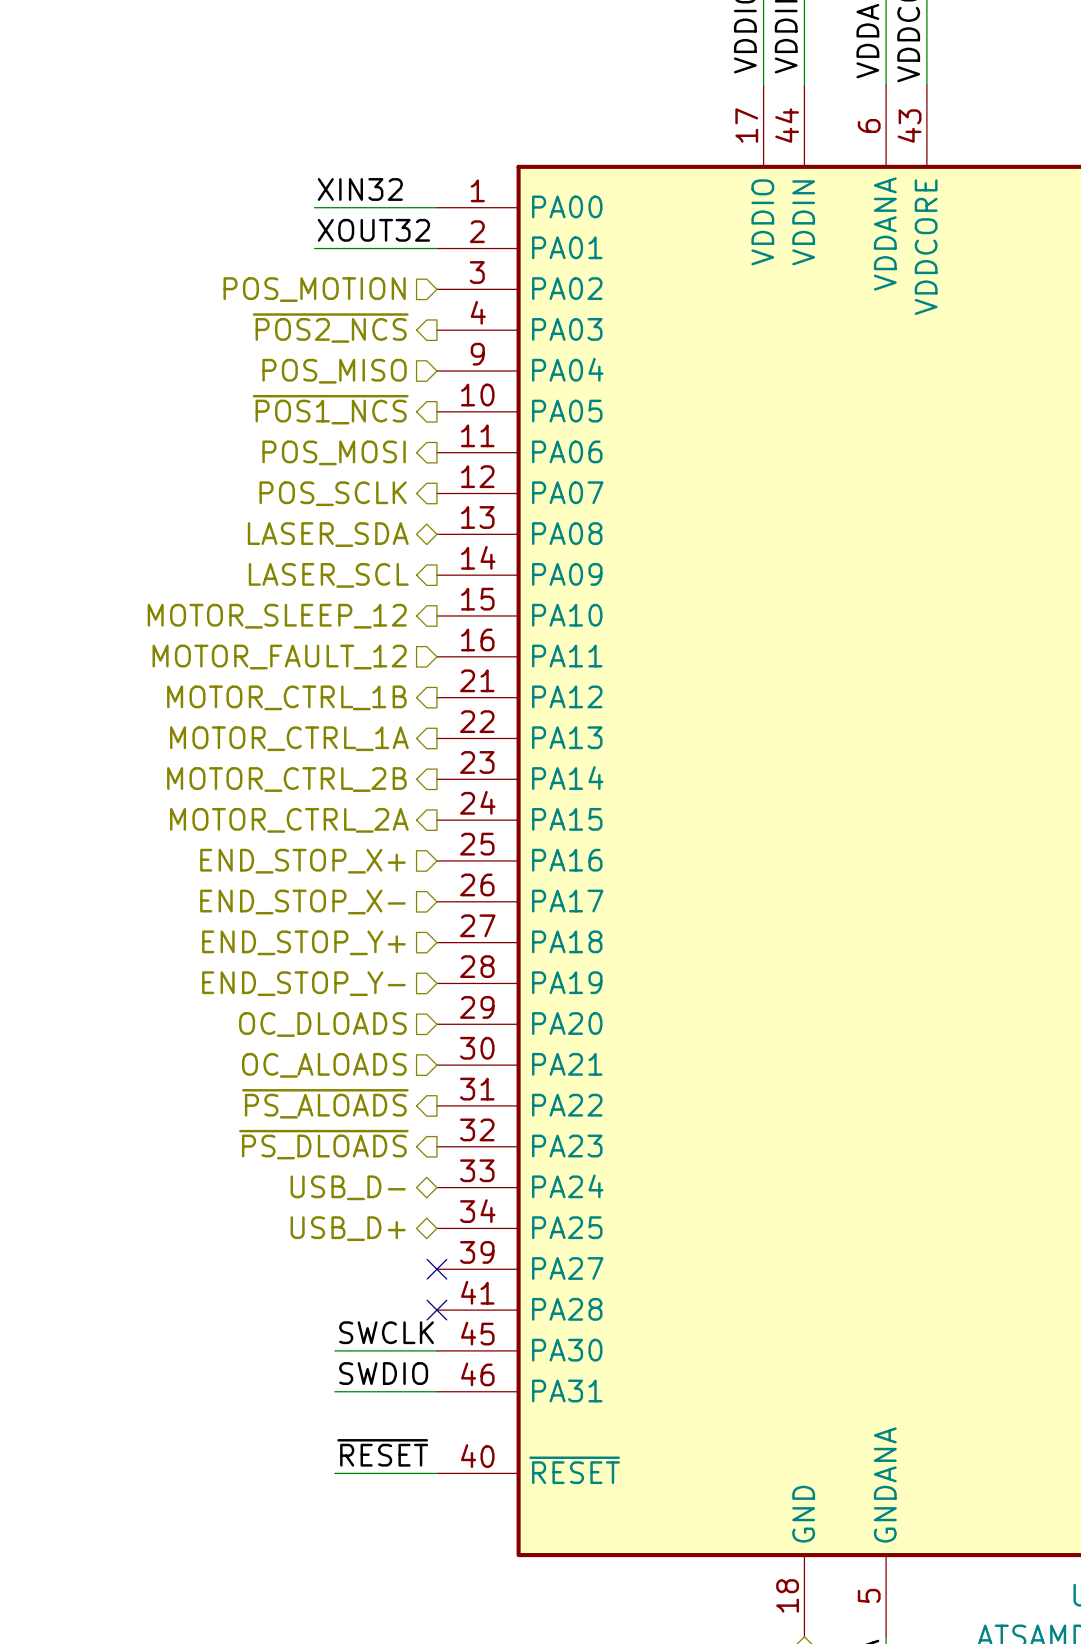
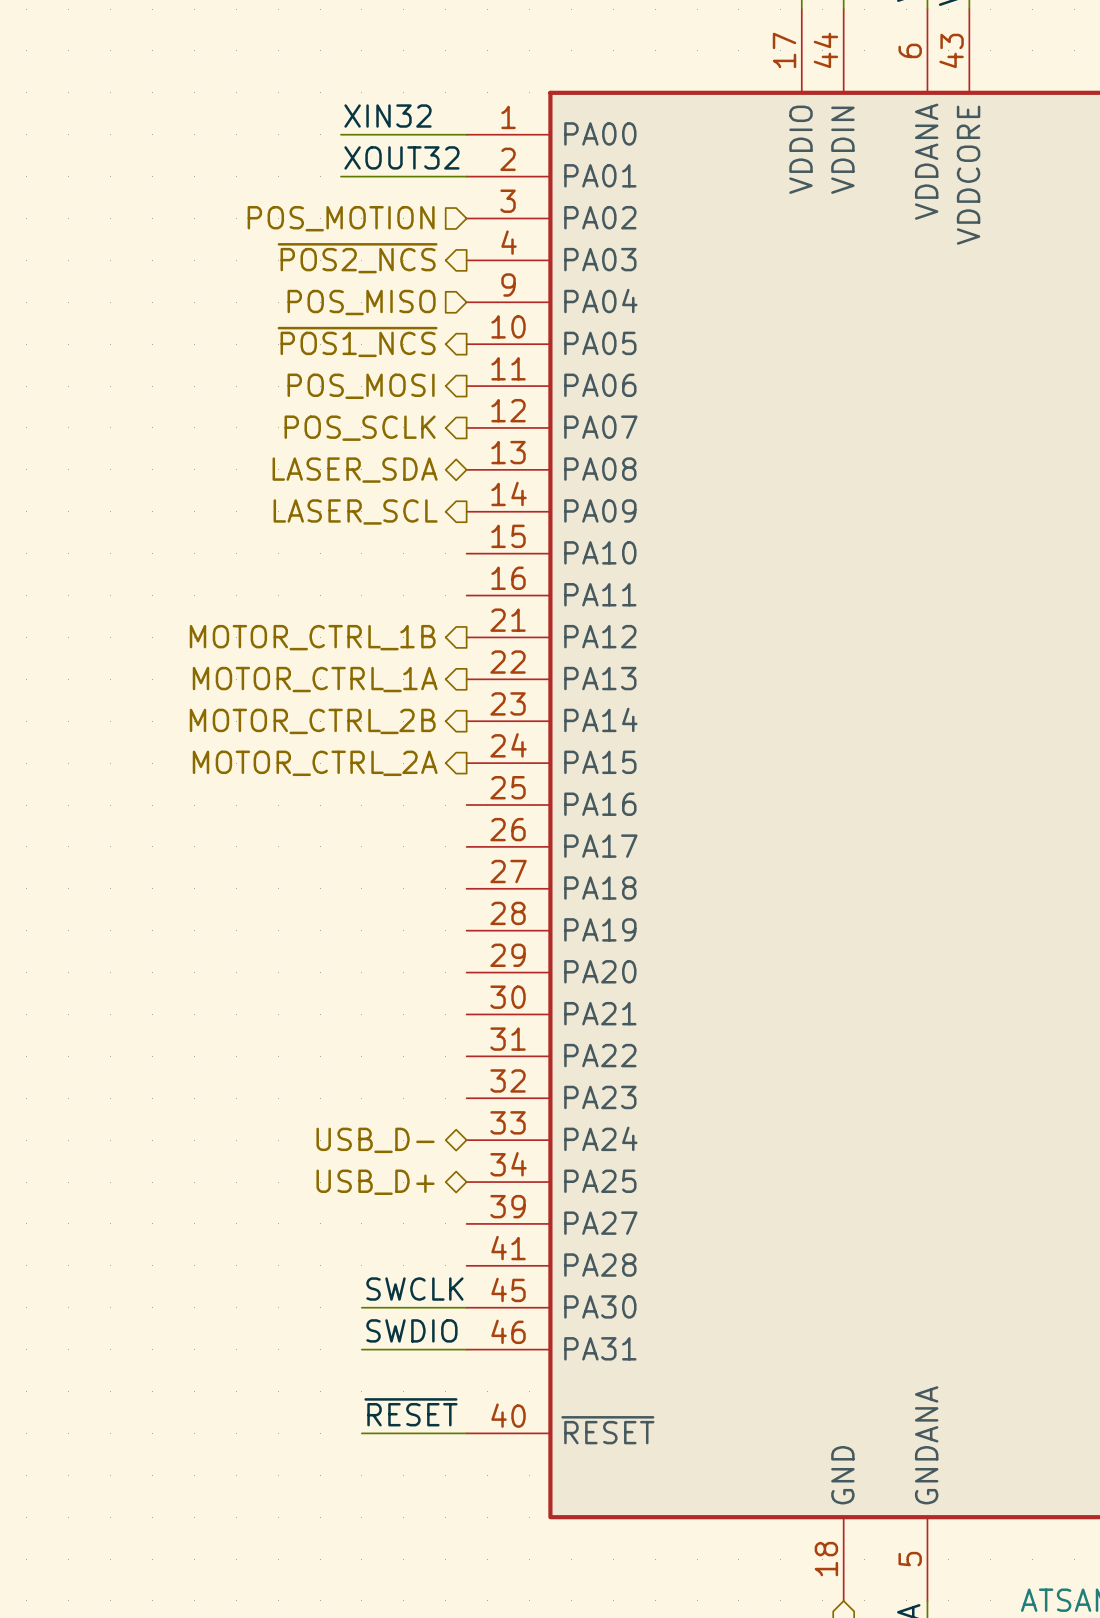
hierarchical label: MOTOR_SLEEP_12 (277, 616) -> none
hierarchical label: MOTOR_FAULT_12 (279, 657) -> none
hierarchical label: END_STOP_X+ (302, 861) -> none
hierarchical label: END_STOP_X- (302, 902) -> none
hierarchical label: END_STOP_Y+ (303, 942) -> none
hierarchical label: END_STOP_Y- (303, 983) -> none
hierarchical label: OC_DLOADS (322, 1024) -> none
hierarchical label: OC_ALOADS (324, 1065) -> none
hierarchical label: ~{PS_ALOADS} (325, 1103) -> none
hierarchical label: ~{PS_DLOADS} (323, 1144) -> none
no-connect mark: (436, 1269) -> none
no-connect mark: (436, 1310) -> none

